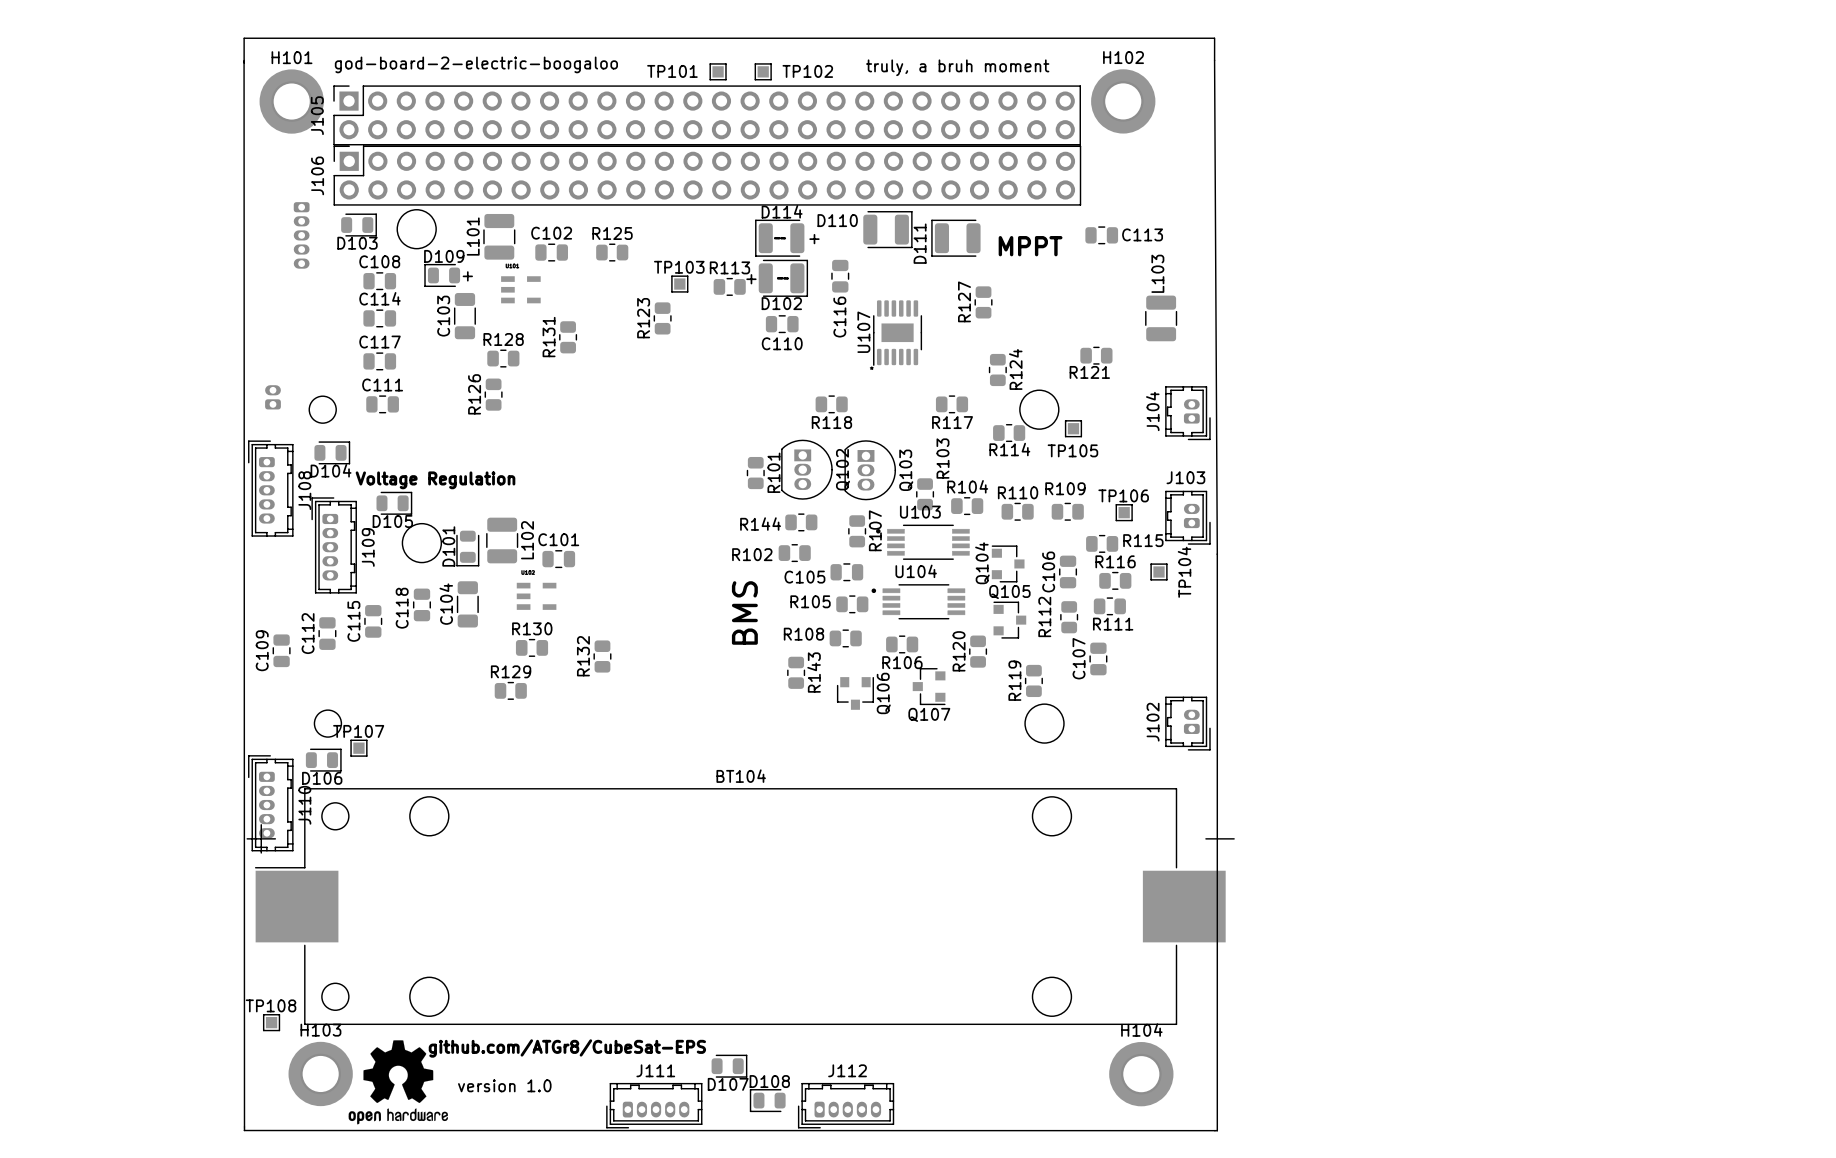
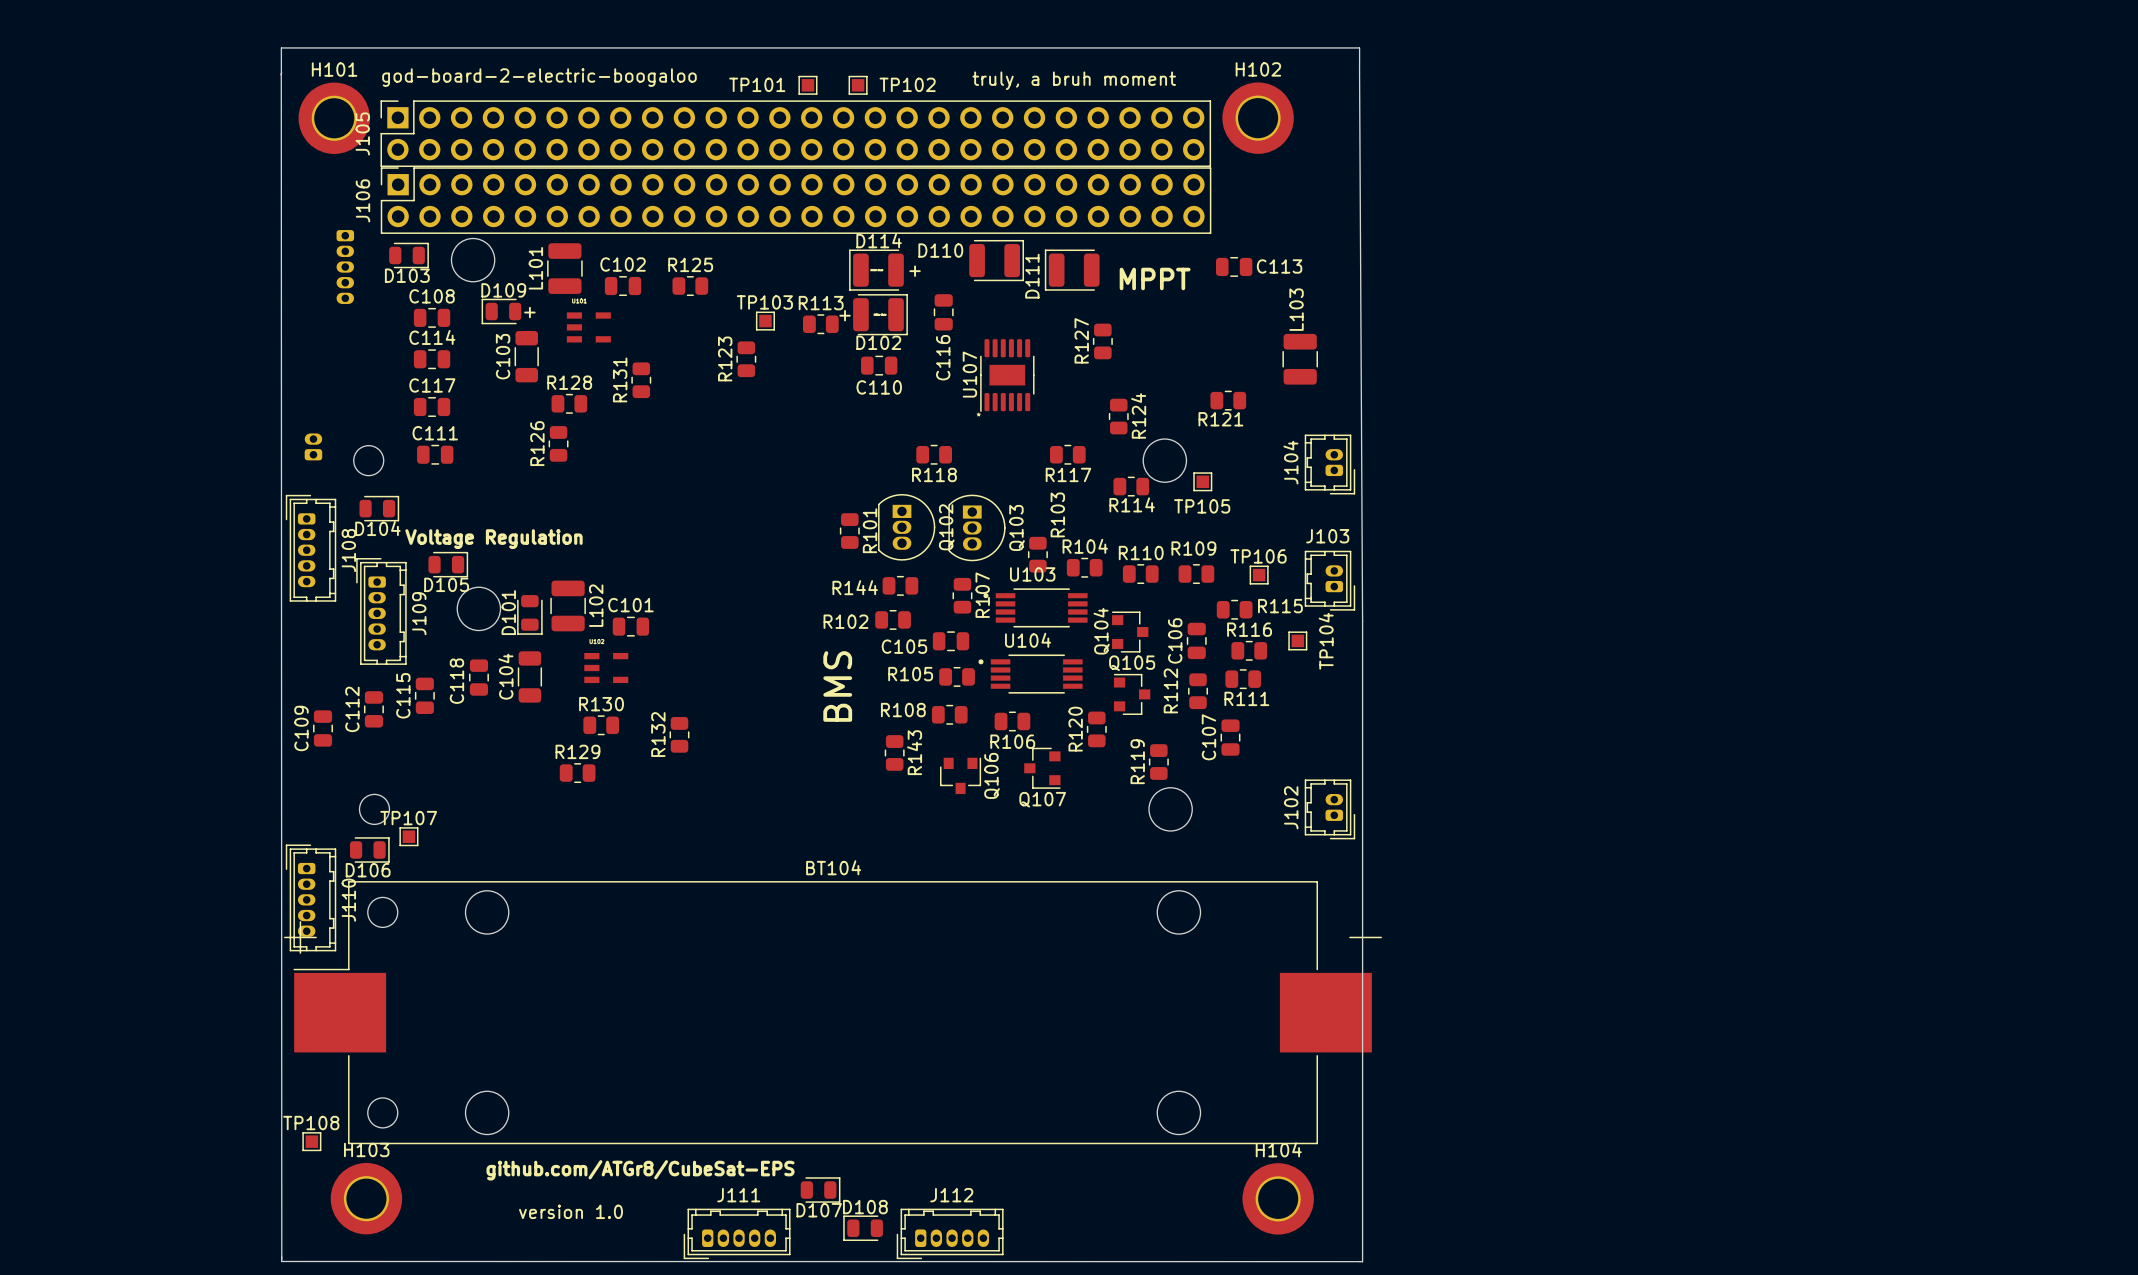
drawing: [348, 1040, 448, 1125] -> none

